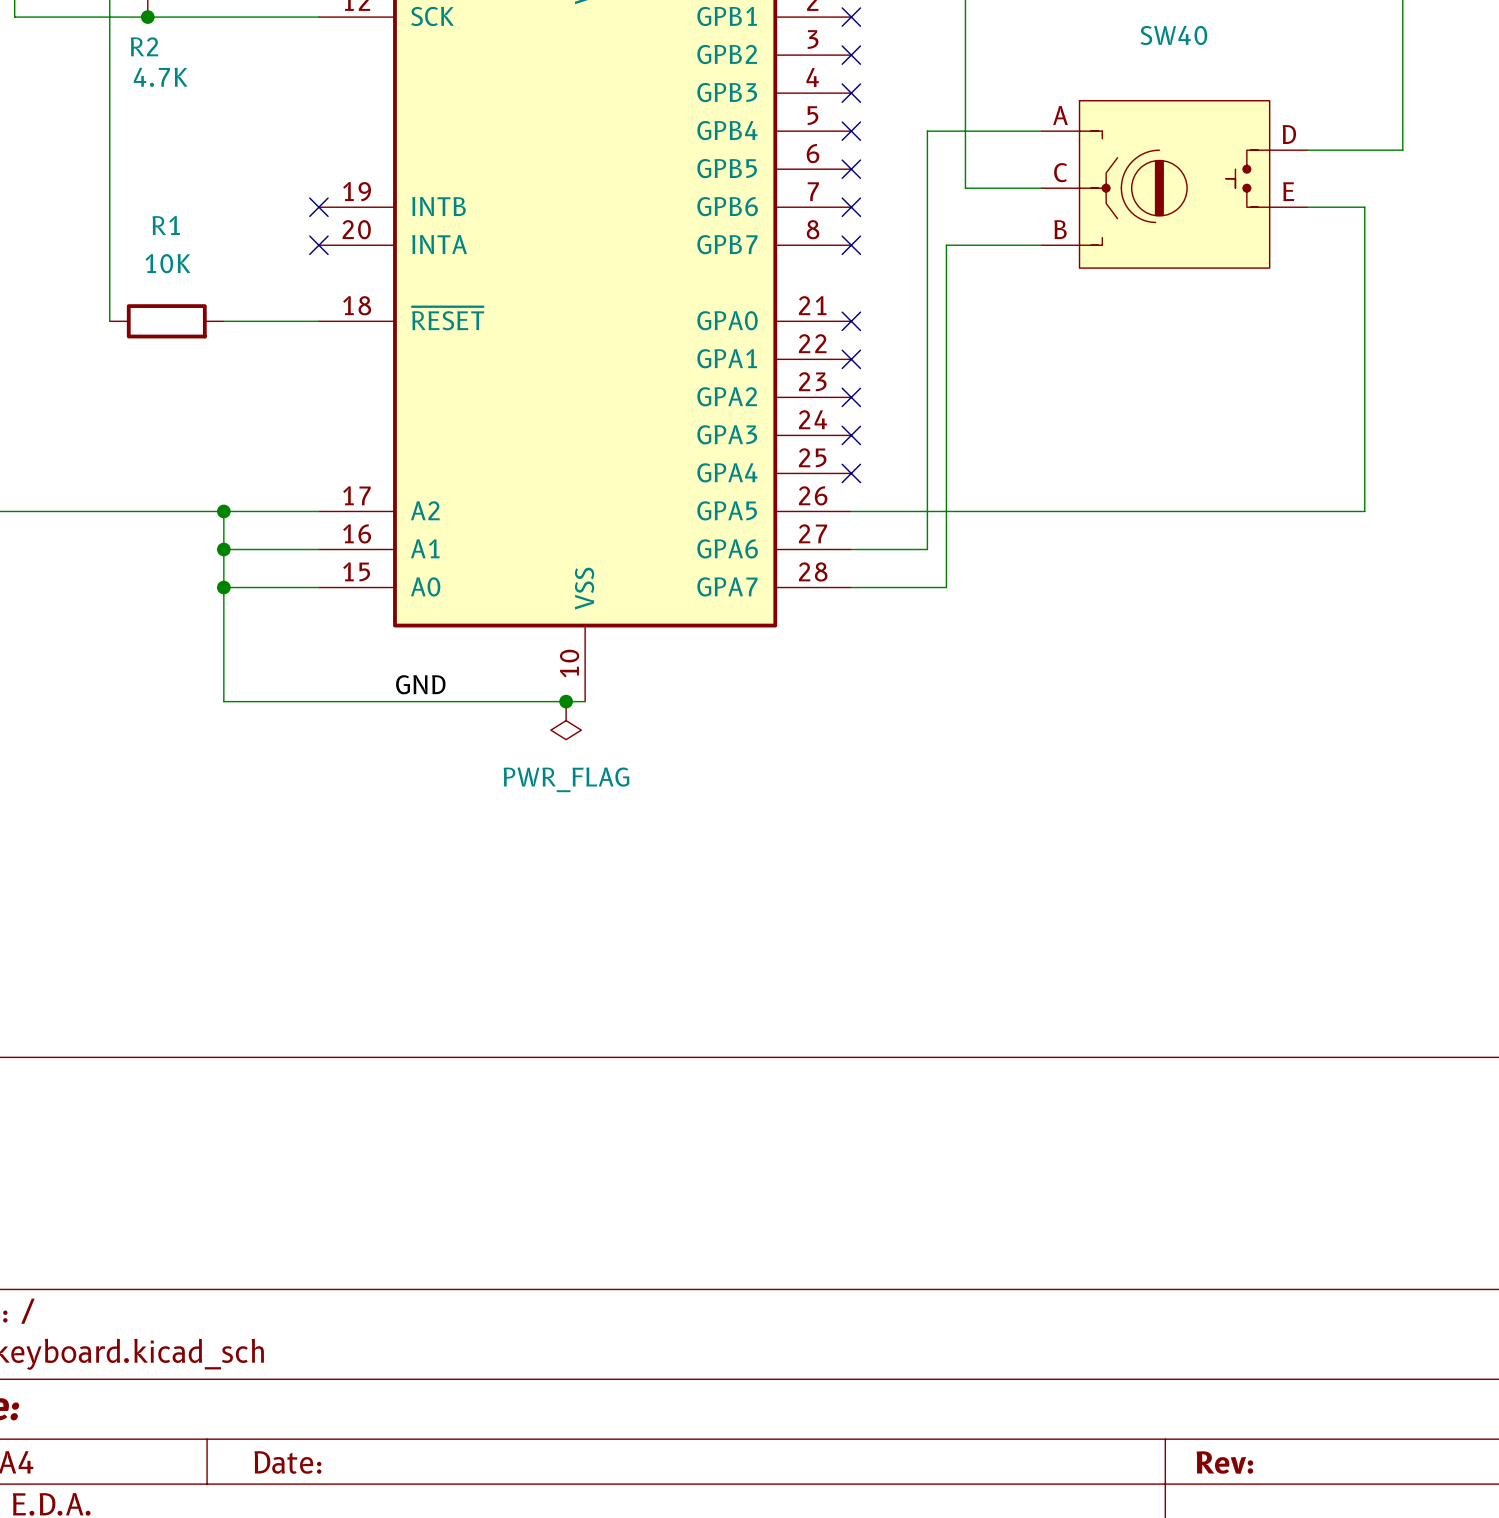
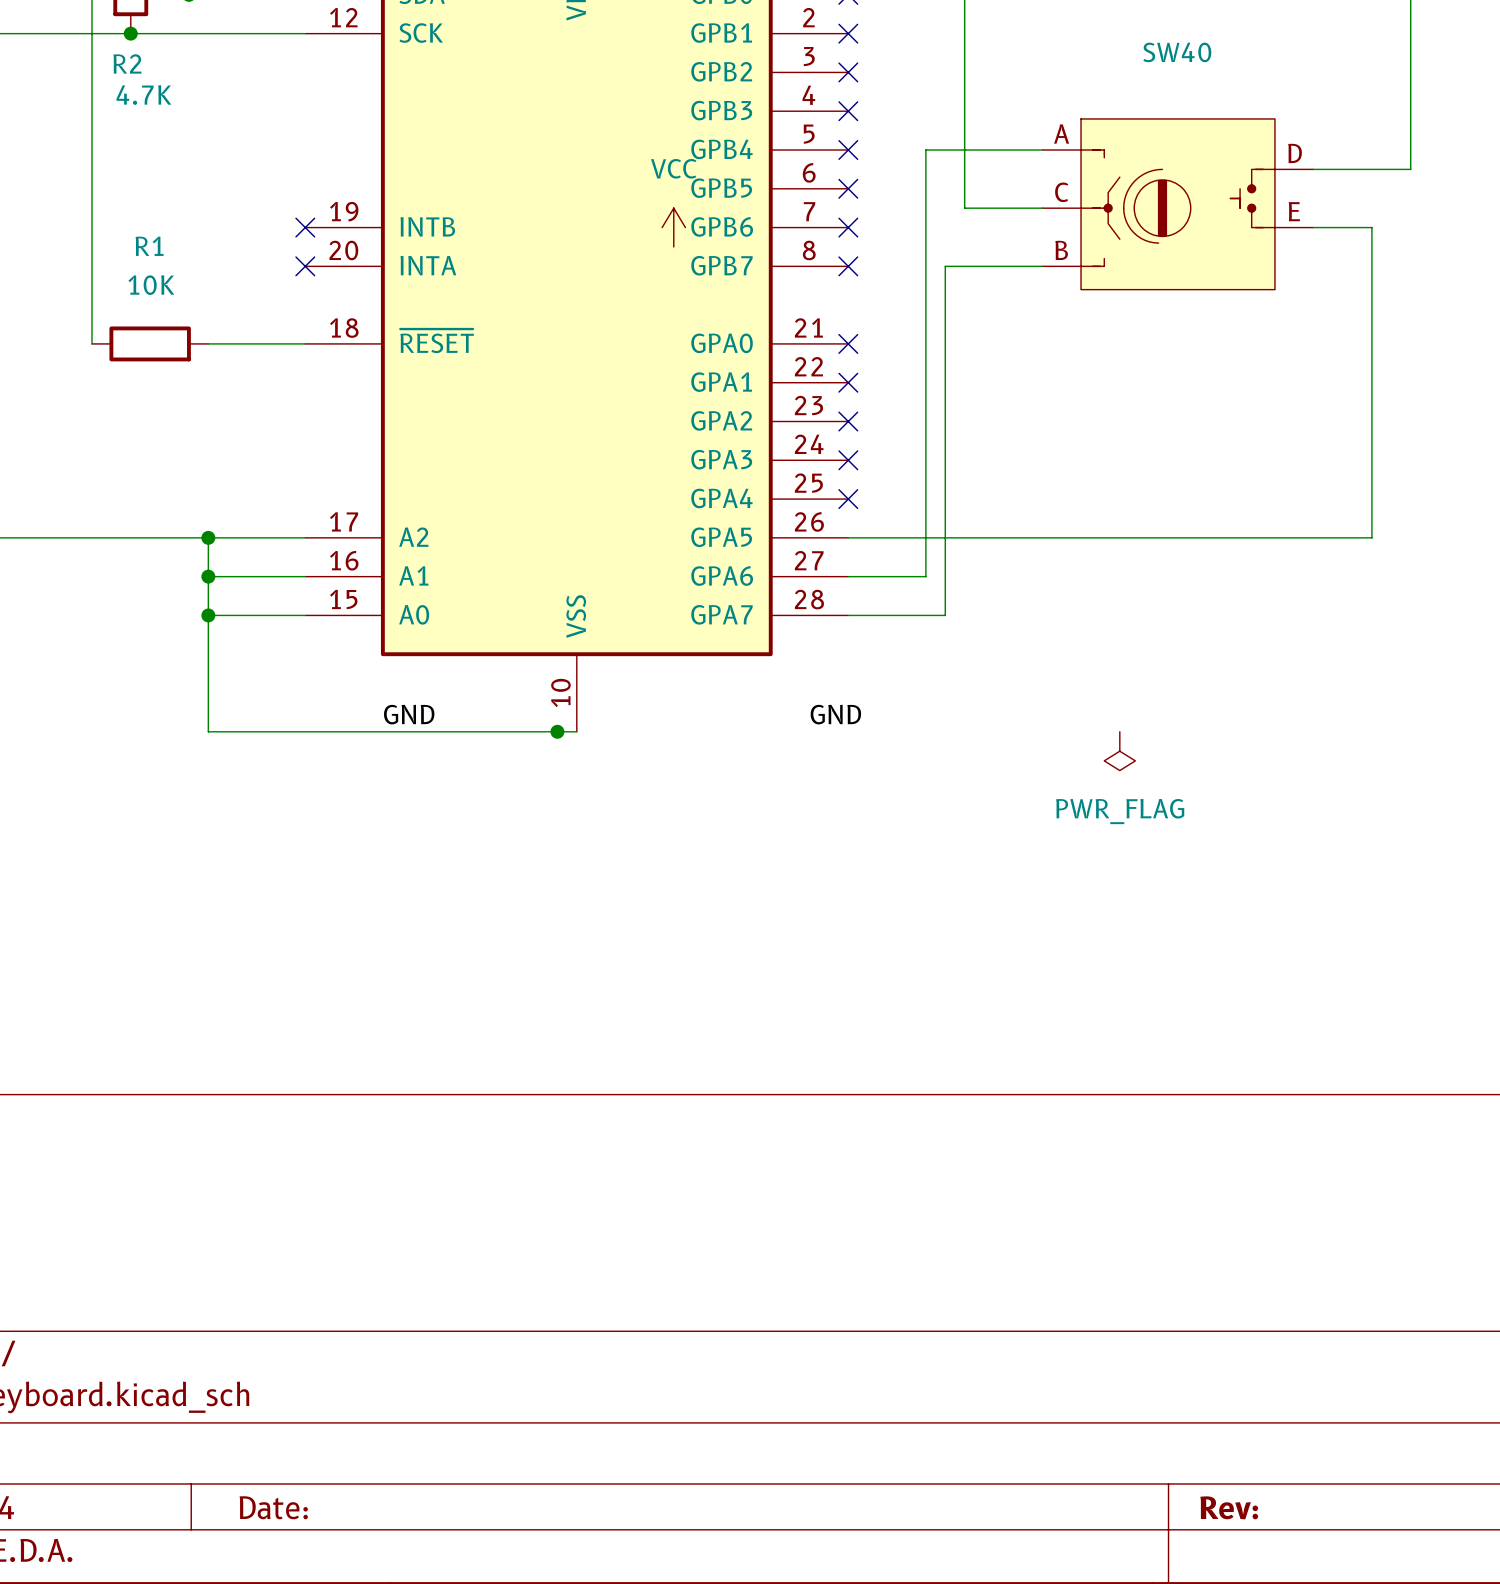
power symbol: none -> VCC (673, 227)
label: none -> GND (835, 714)
power symbol: PWR_FLAG (566, 720) -> none
power symbol: none -> PWR_FLAG (1119, 751)

